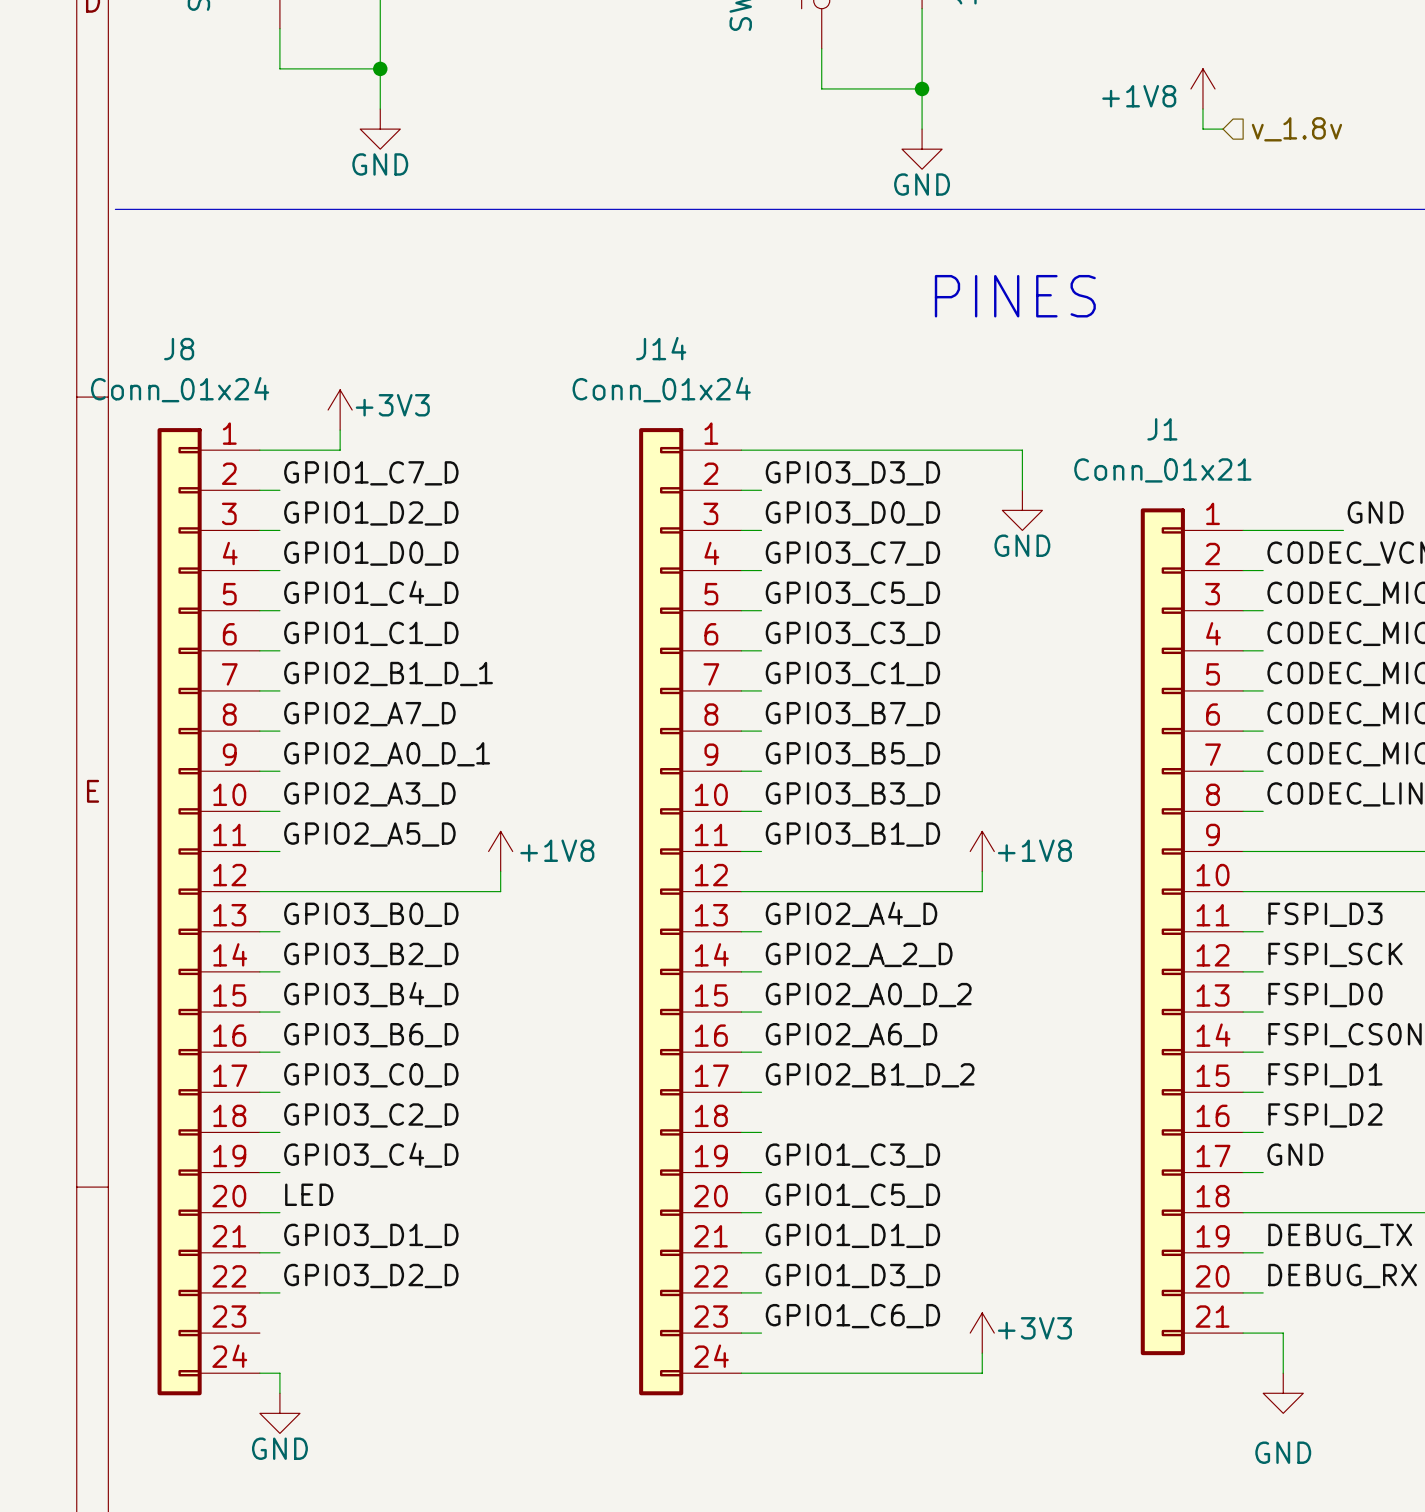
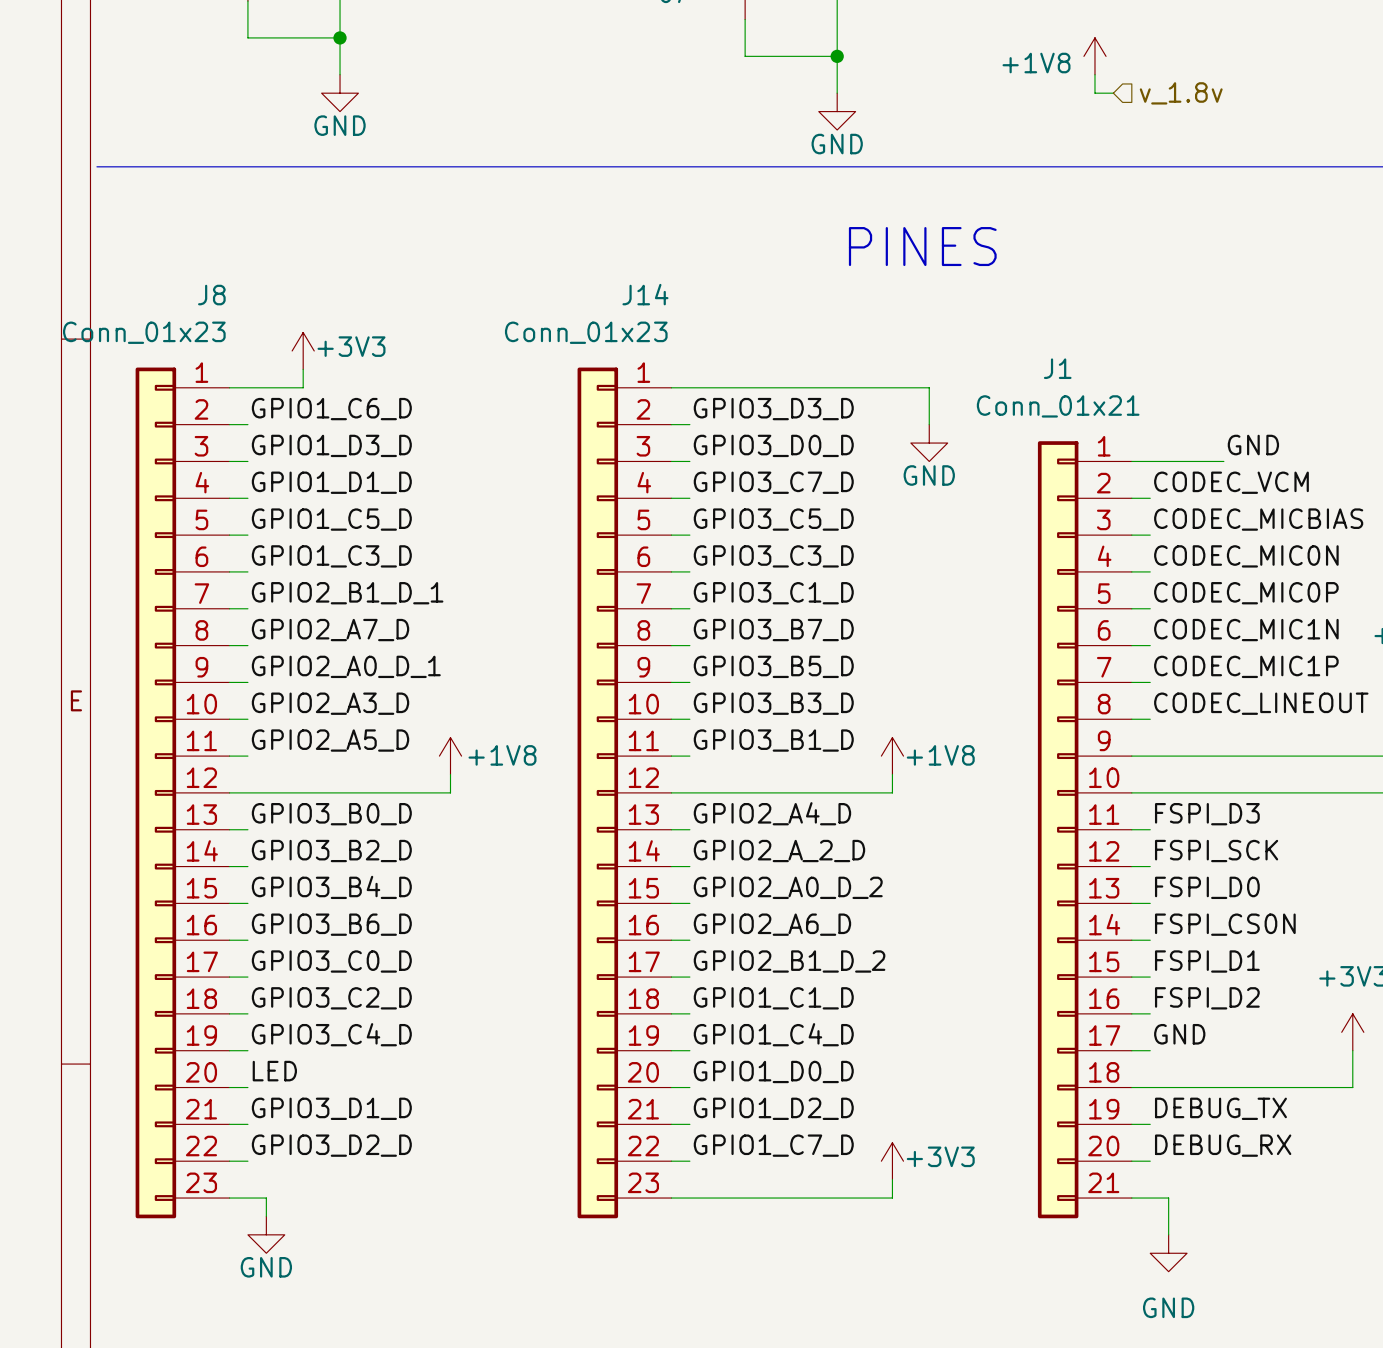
J14 name position: J14 (661, 348) -> J14 (645, 294)
J8 name position: J8 (179, 349) -> J8 (211, 295)
J8 value: Conn_01x24 (180, 389) -> Conn_01x23 (144, 332)
J14 value: Conn_01x24 (661, 389) -> Conn_01x23 (586, 332)
J8 symbol: [157, 428, 260, 1396] -> [135, 367, 230, 1219]
J14 symbol: [639, 428, 742, 1396] -> [577, 367, 672, 1219]
label: GPIO1_C7_D (371, 473) -> GPIO1_C6_D (331, 409)
label: GPIO1_D2_D (371, 513) -> GPIO1_D3_D (331, 445)
label: GPIO1_D0_D (371, 553) -> GPIO1_D1_D (331, 482)
label: GPIO1_C4_D (371, 593) -> GPIO1_C5_D (331, 519)
label: GPIO1_C1_D (371, 633) -> GPIO1_C3_D (331, 556)
label: none -> GPIO1_C1_D (773, 998)
label: GPIO1_C3_D (852, 1155) -> GPIO1_C4_D (773, 1034)
label: GPIO1_C5_D (852, 1195) -> GPIO1_D0_D (773, 1071)
label: GPIO1_D1_D (852, 1235) -> GPIO1_D2_D (773, 1108)
label: GPIO1_D3_D (852, 1275) -> GPIO1_C7_D (773, 1145)
wire: none -> (892, 1179) (892, 1198) (689, 1198)
label: GPIO1_C6_D (852, 1316) -> none
wire: none -> (229, 1198) (266, 1198) (266, 1216)
power symbol position: +3V3 (982, 1333) -> +3V3 (892, 1161)
wire: (982, 1353) (982, 1373) (741, 1373) -> none
wire: (259, 1373) (279, 1373) (279, 1393) -> none
power symbol position: GND (279, 1413) -> GND (266, 1234)

